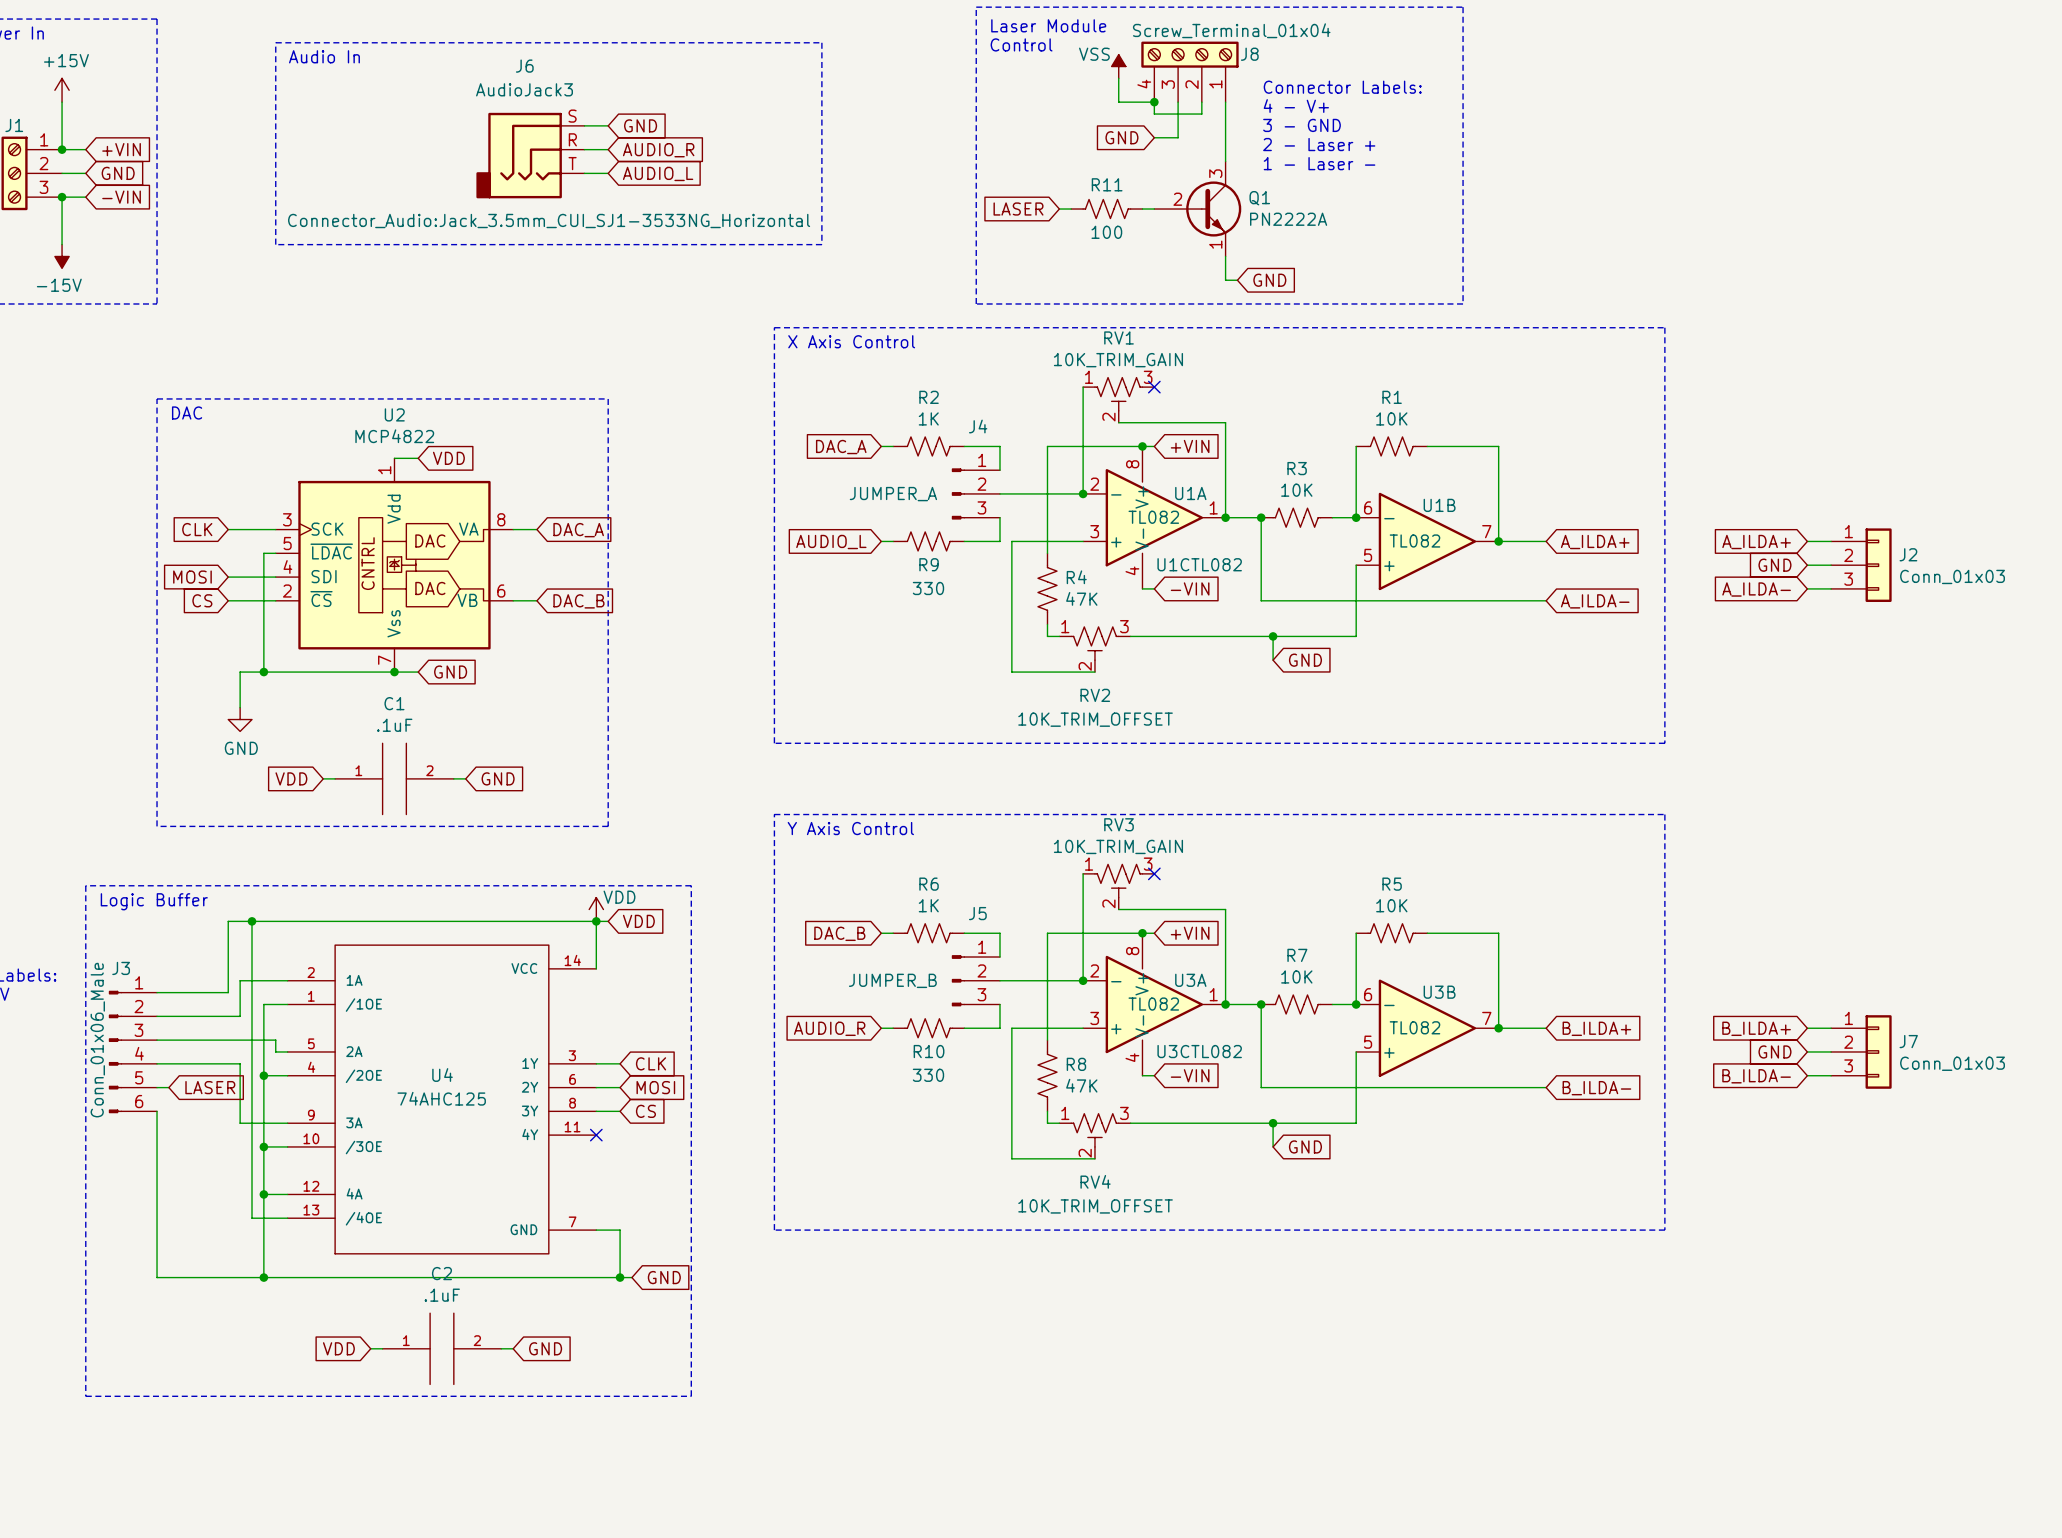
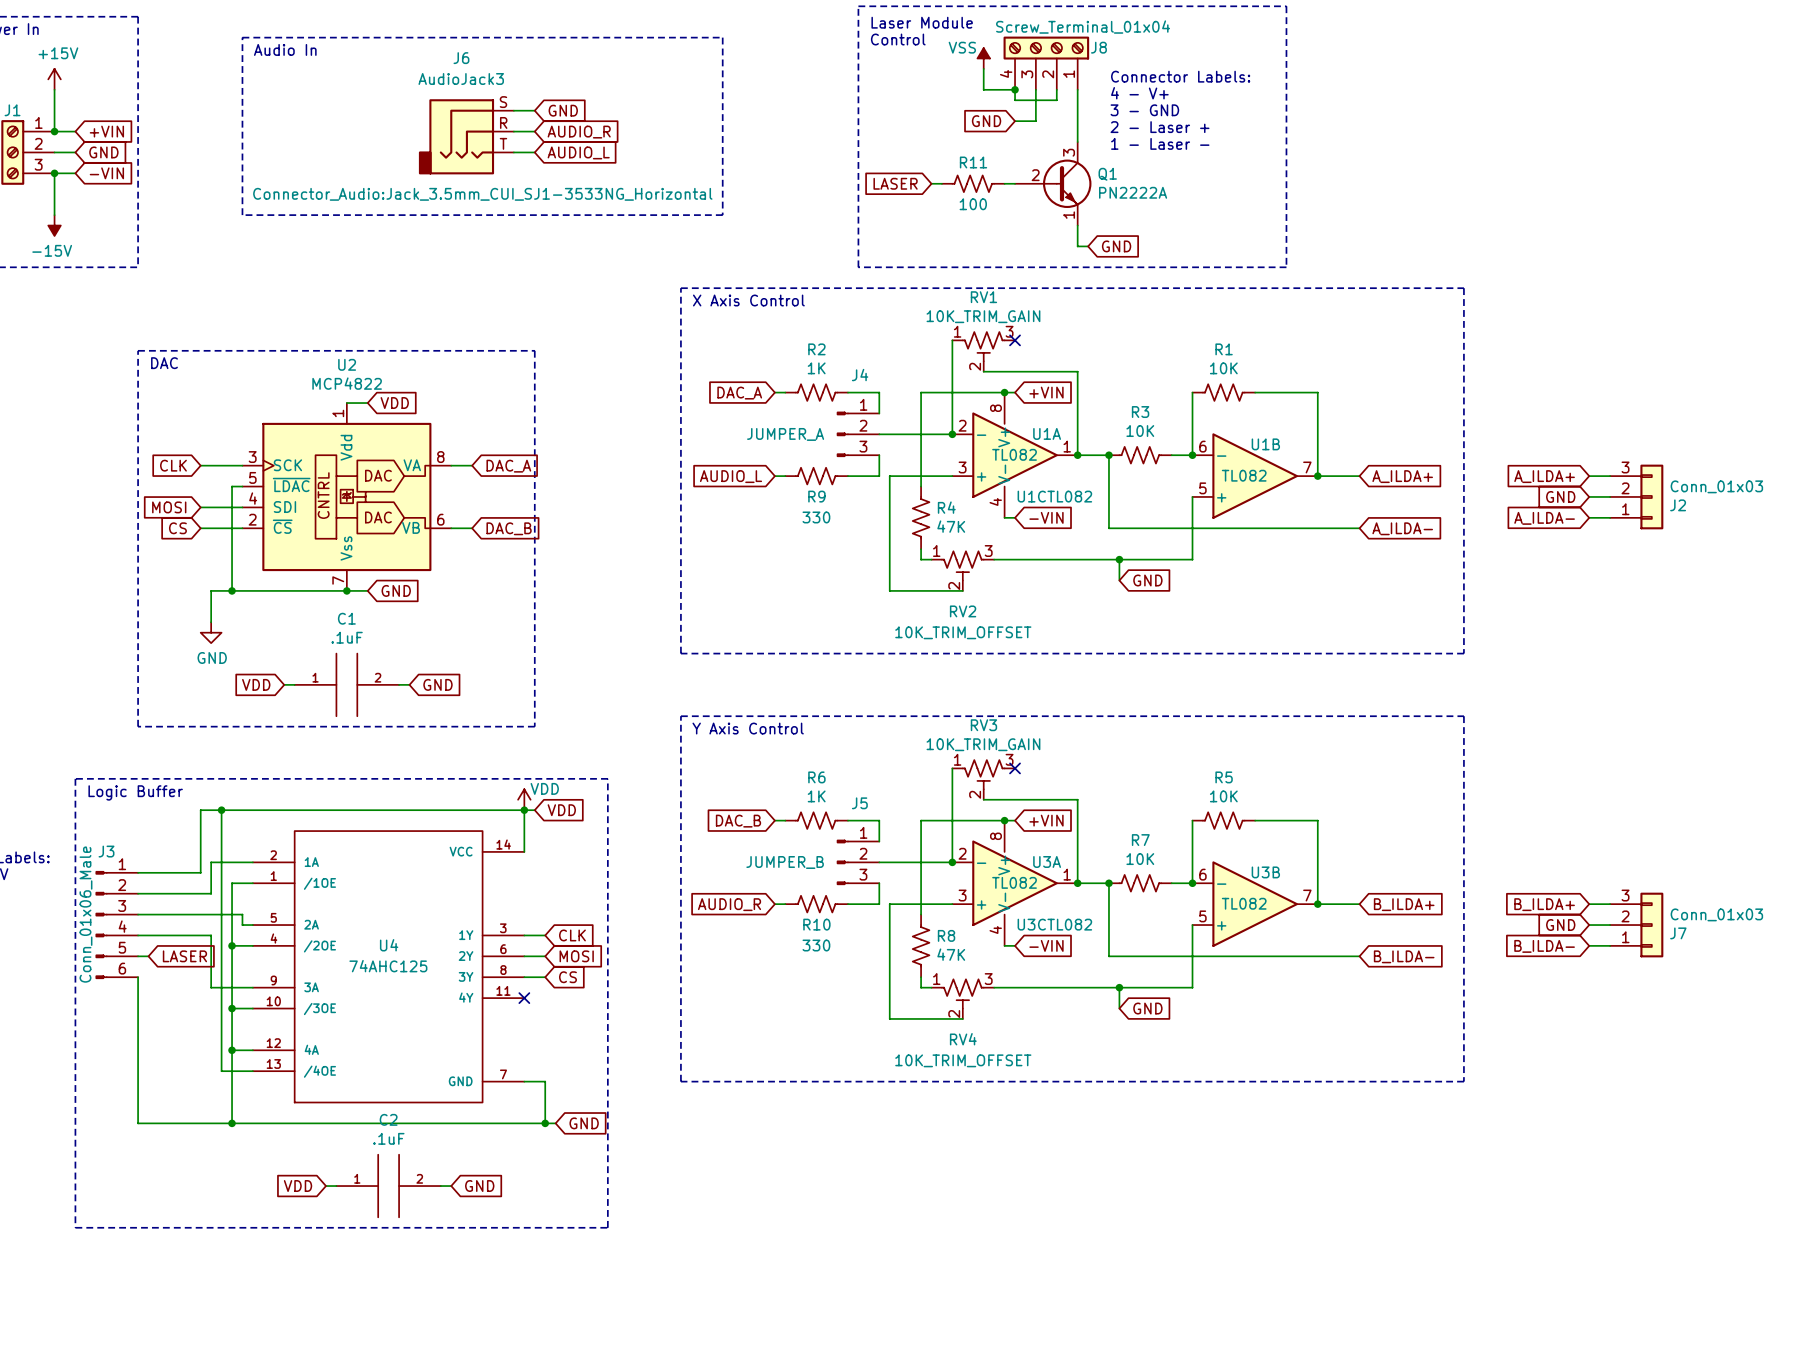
J2 flip: as is (1878, 565) -> up-down (1651, 496)
J7 flip: as is (1878, 1051) -> up-down (1651, 925)

